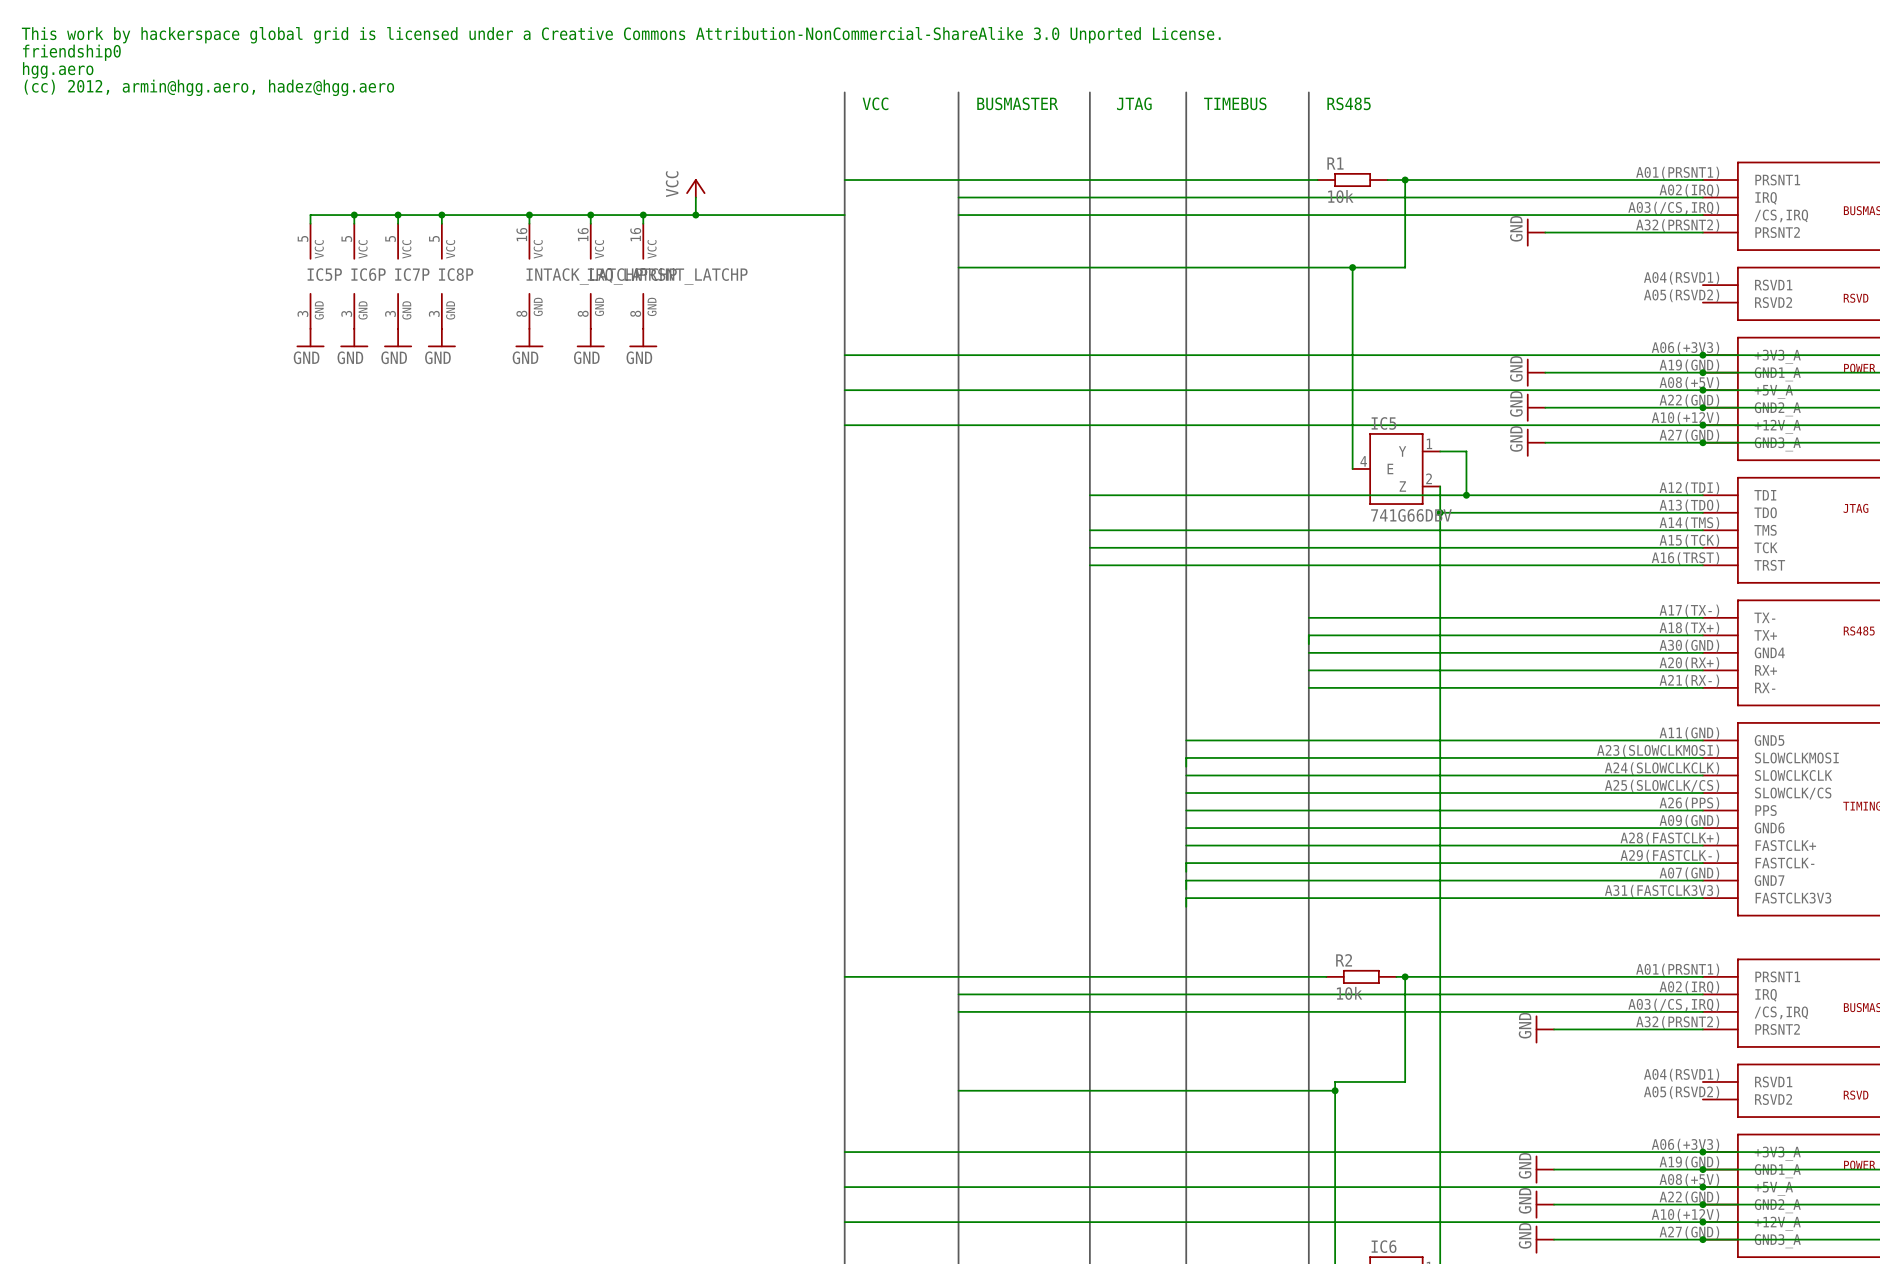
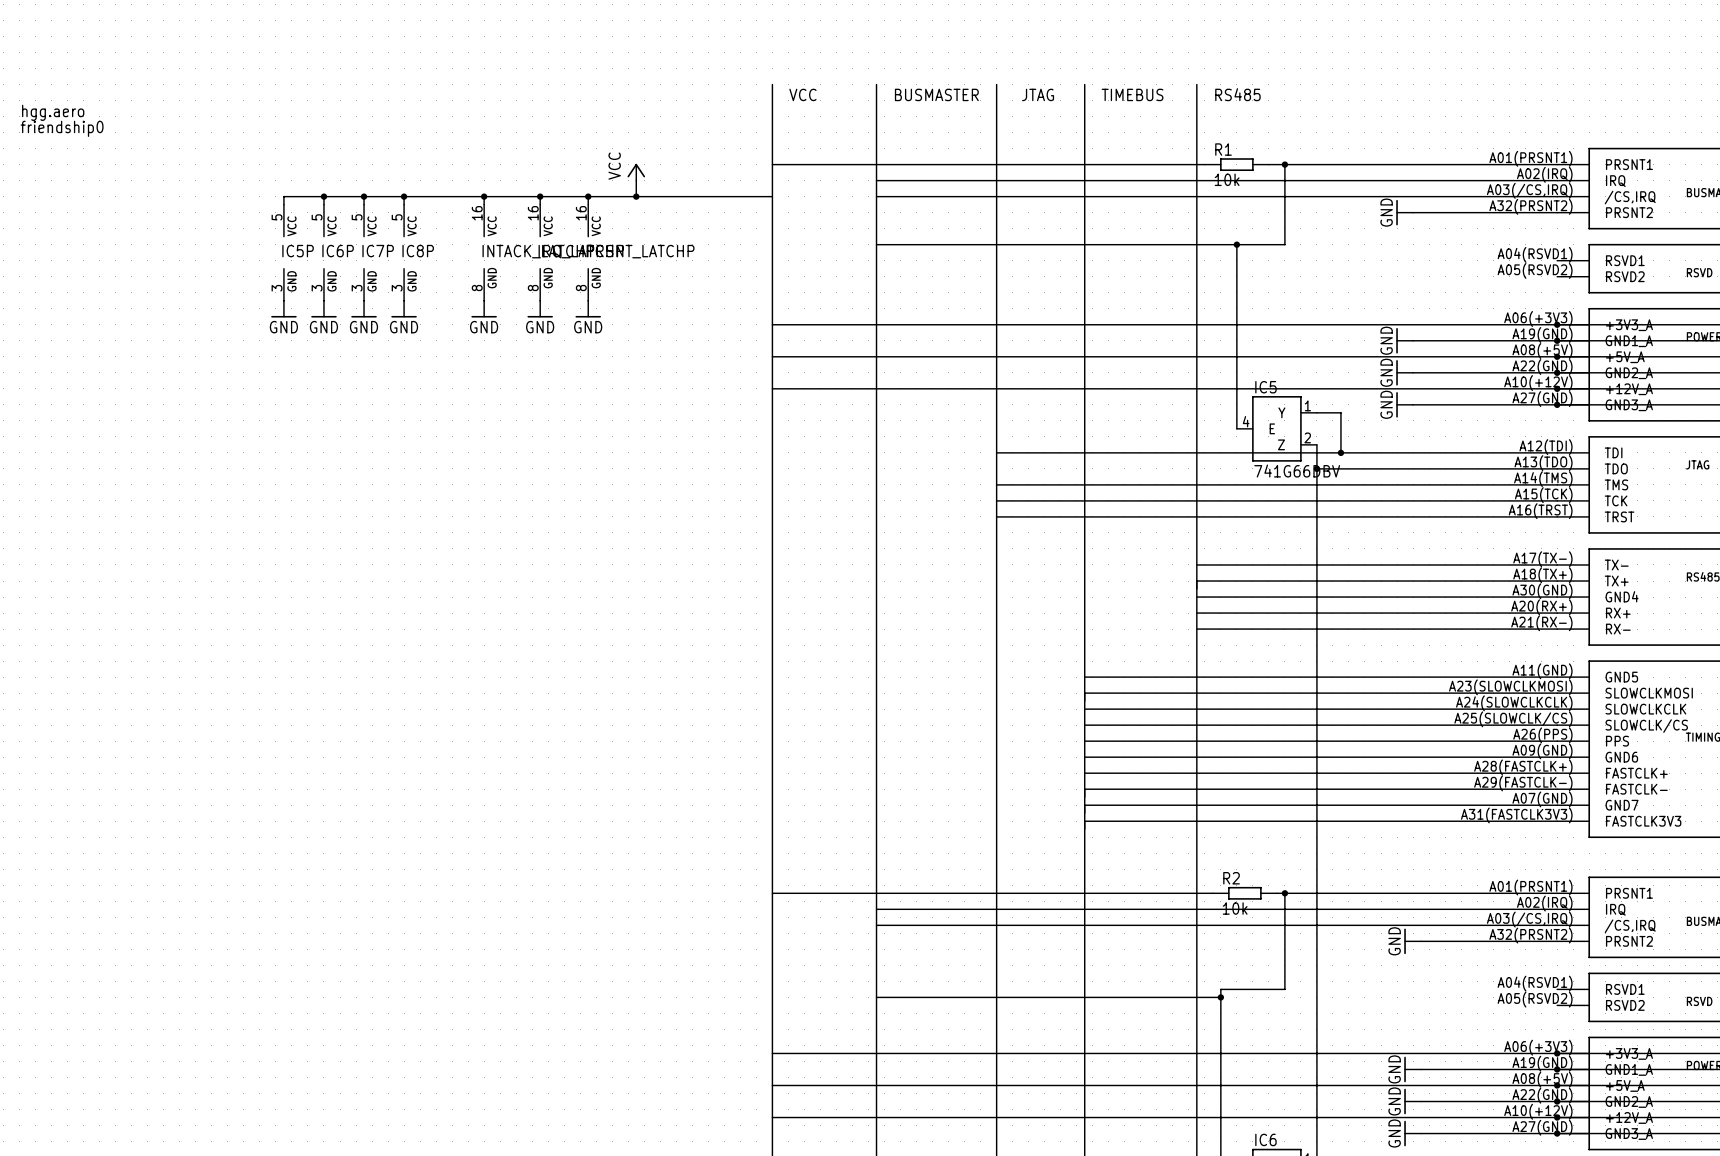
text: This work by hackerspace global grid is licensed under a Creative Commons Attribution-NonCommercial-ShareAlike 3.0 Unported License. (621, 35) -> none
text position: friendship0 (71, 52) -> friendship0 (62, 128)
text position: hgg.aero (58, 70) -> hgg.aero (53, 112)
text: (cc) 2012, armin@hgg.aero, hadez@hgg.aero (209, 87) -> none

